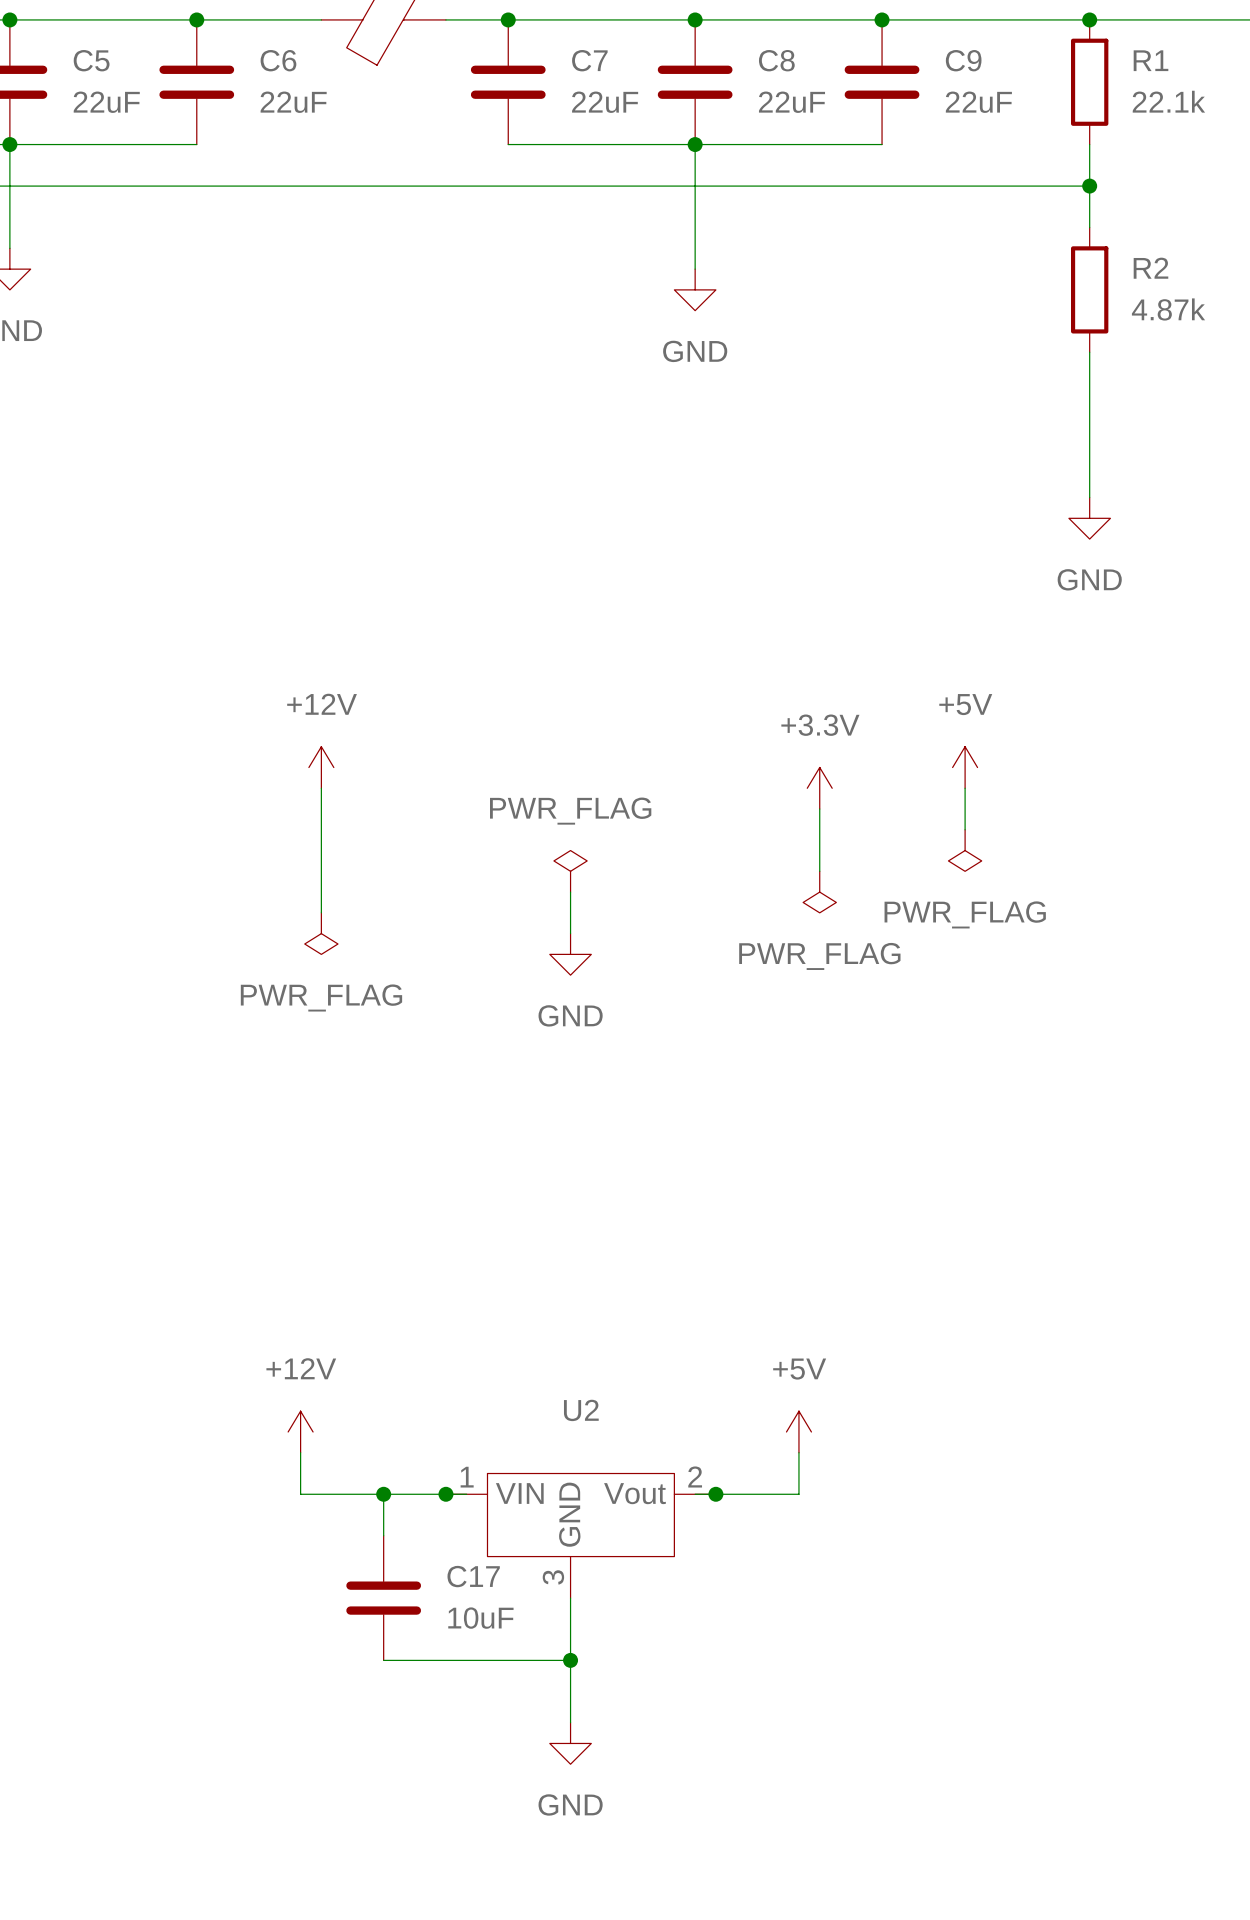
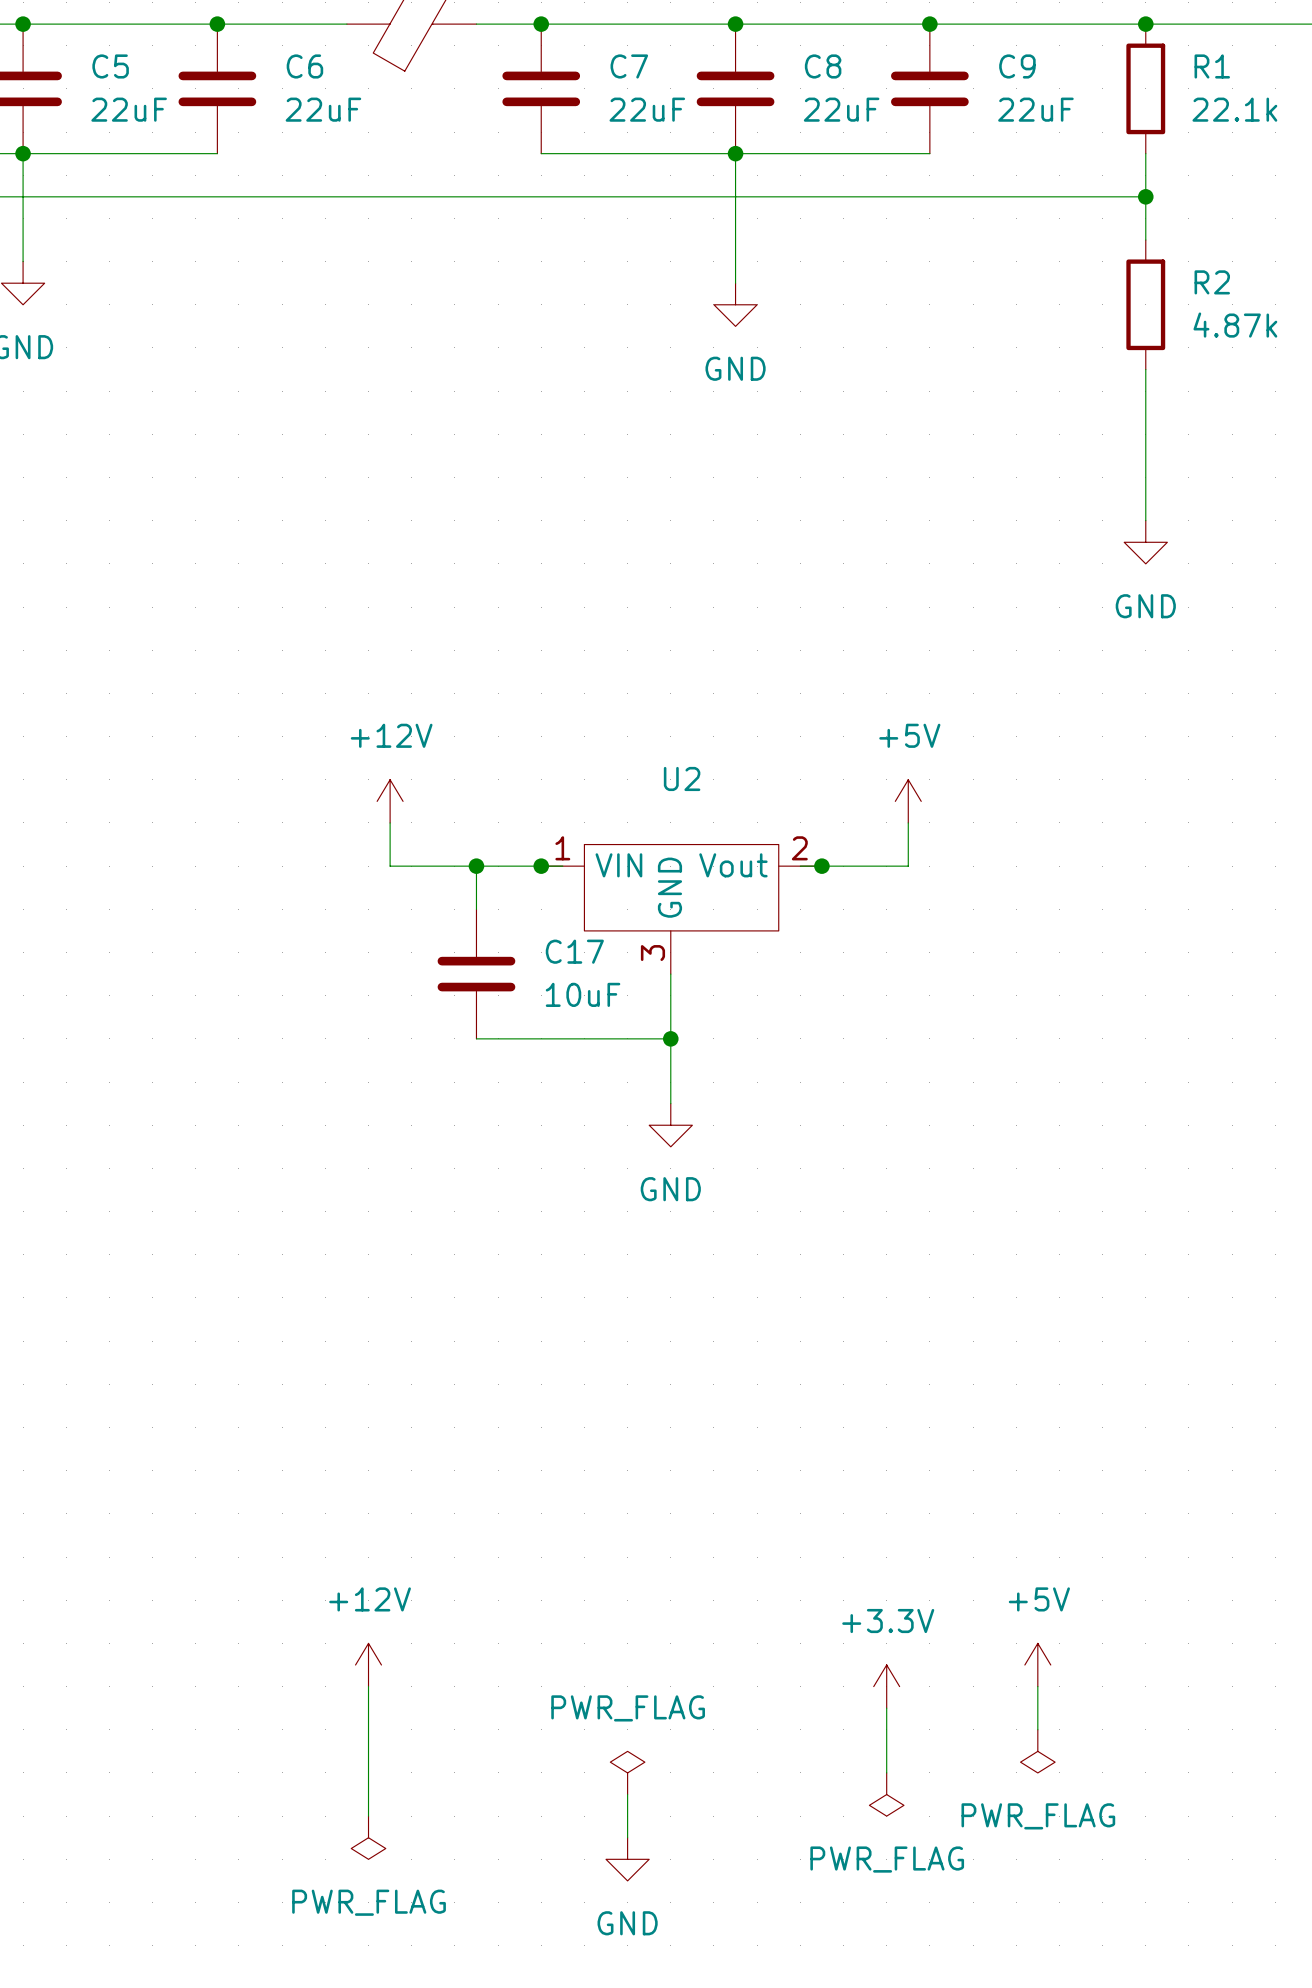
power symbol position: +12V (321, 767) -> +12V (390, 801)
power symbol position: +5V (965, 767) -> +5V (908, 801)
wire: (321, 788) (321, 912) -> (670, 974) (670, 1103)
wire: none -> (390, 822) (390, 866) (562, 866)
power symbol: +3.3V (819, 788) -> none
wire: none -> (908, 822) (908, 866) (800, 866)
wire: (965, 788) (965, 829) -> none
wire: (819, 809) (819, 871) -> none
junction: none -> (476, 866)
junction: none -> (541, 866)
junction: none -> (821, 866)
power symbol: PWR_FLAG (965, 850) -> none
power symbol: PWR_FLAG (570, 871) -> none
wire: (570, 892) (570, 933) -> (476, 866) (476, 909)
power symbol: PWR_FLAG (819, 892) -> none
power symbol: PWR_FLAG (321, 933) -> none
power symbol position: GND (570, 954) -> GND (670, 1125)
wire: none -> (476, 1038) (670, 1038)
junction: none -> (670, 1038)
power symbol position: +12V (300, 1431) -> +12V (368, 1665)
power symbol position: +5V (798, 1431) -> +5V (1037, 1665)
wire: (300, 1452) (300, 1494) (466, 1494) -> none
wire: (798, 1452) (798, 1494) (695, 1494) -> none
wire: (383, 1494) (383, 1535) -> (627, 1794) (627, 1837)
junction: (383, 1494) -> none
junction: (445, 1494) -> none
junction: (715, 1494) -> none
U2 position: (580, 1535) -> (681, 909)
C17 position: (383, 1598) -> (476, 974)
wire: (570, 1598) (570, 1722) -> (368, 1686) (368, 1816)
power symbol: none -> +3.3V (886, 1686)
wire: none -> (1037, 1686) (1037, 1729)
wire: none -> (886, 1708) (886, 1772)
wire: (383, 1660) (570, 1660) -> none
junction: (570, 1660) -> none
power symbol: none -> PWR_FLAG (1037, 1751)
power symbol: none -> PWR_FLAG (627, 1772)
power symbol: none -> PWR_FLAG (886, 1794)
power symbol position: GND (570, 1743) -> GND (627, 1859)
power symbol: none -> PWR_FLAG (368, 1837)

